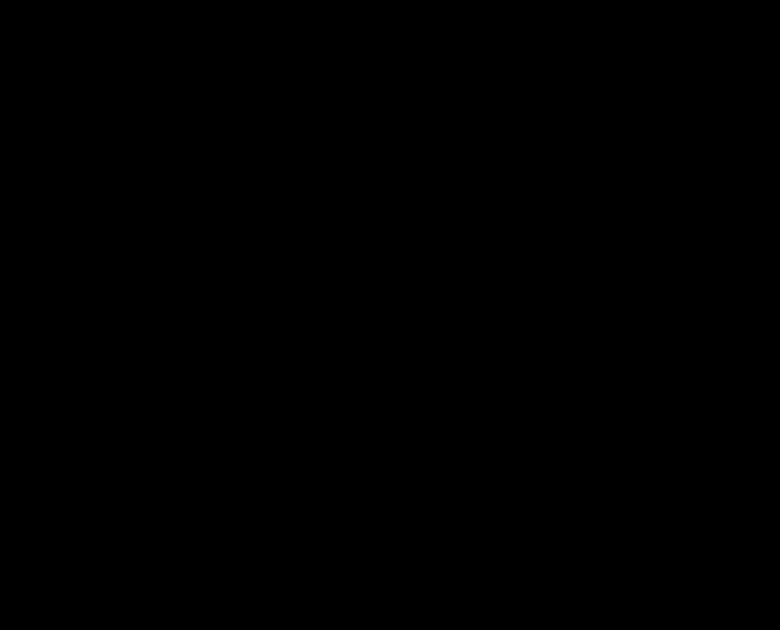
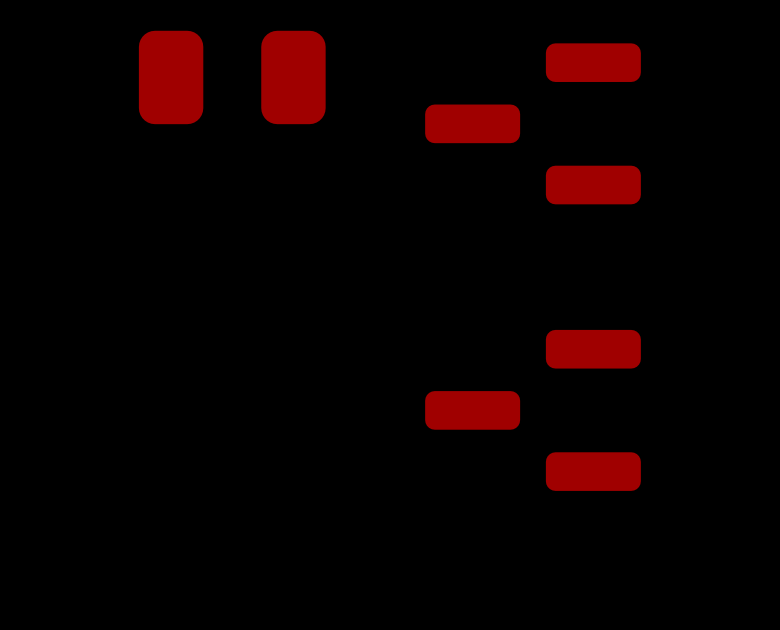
part: none -> (232, 77)
part: none -> (533, 123)
part: none -> (533, 410)

